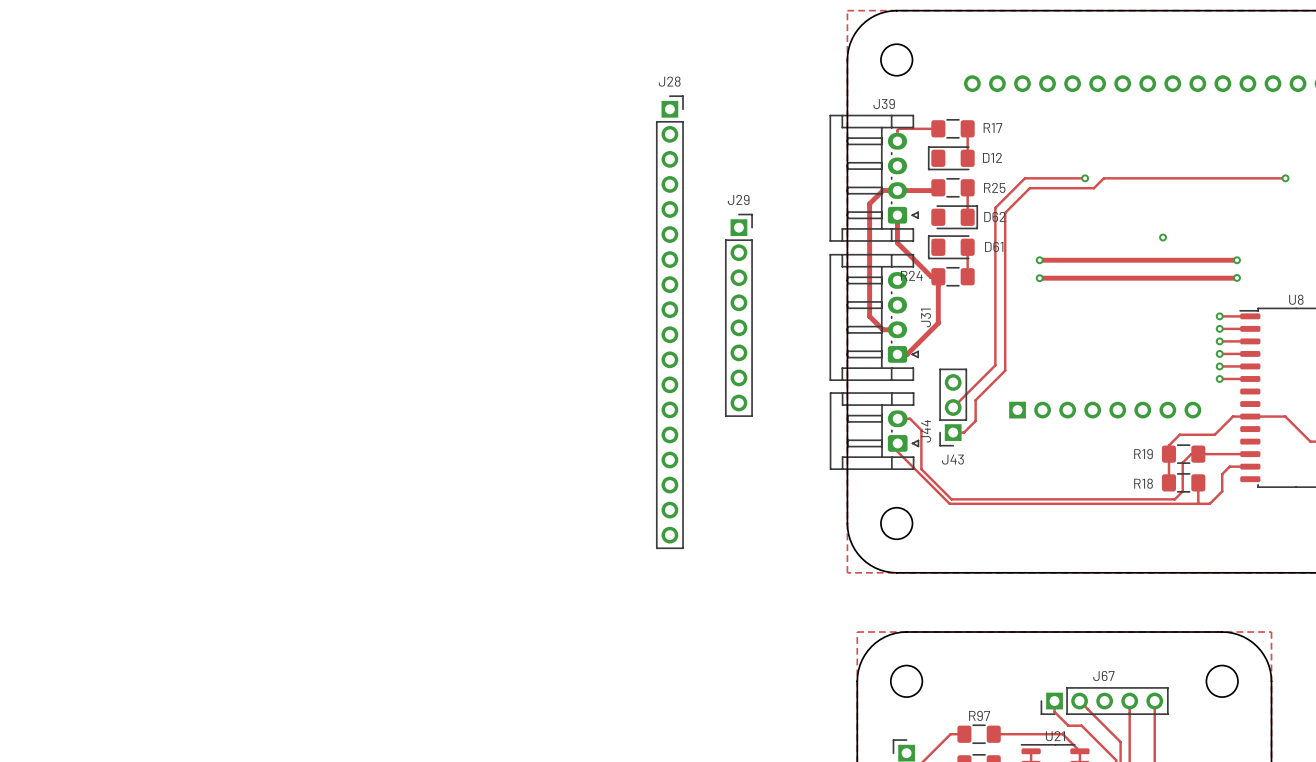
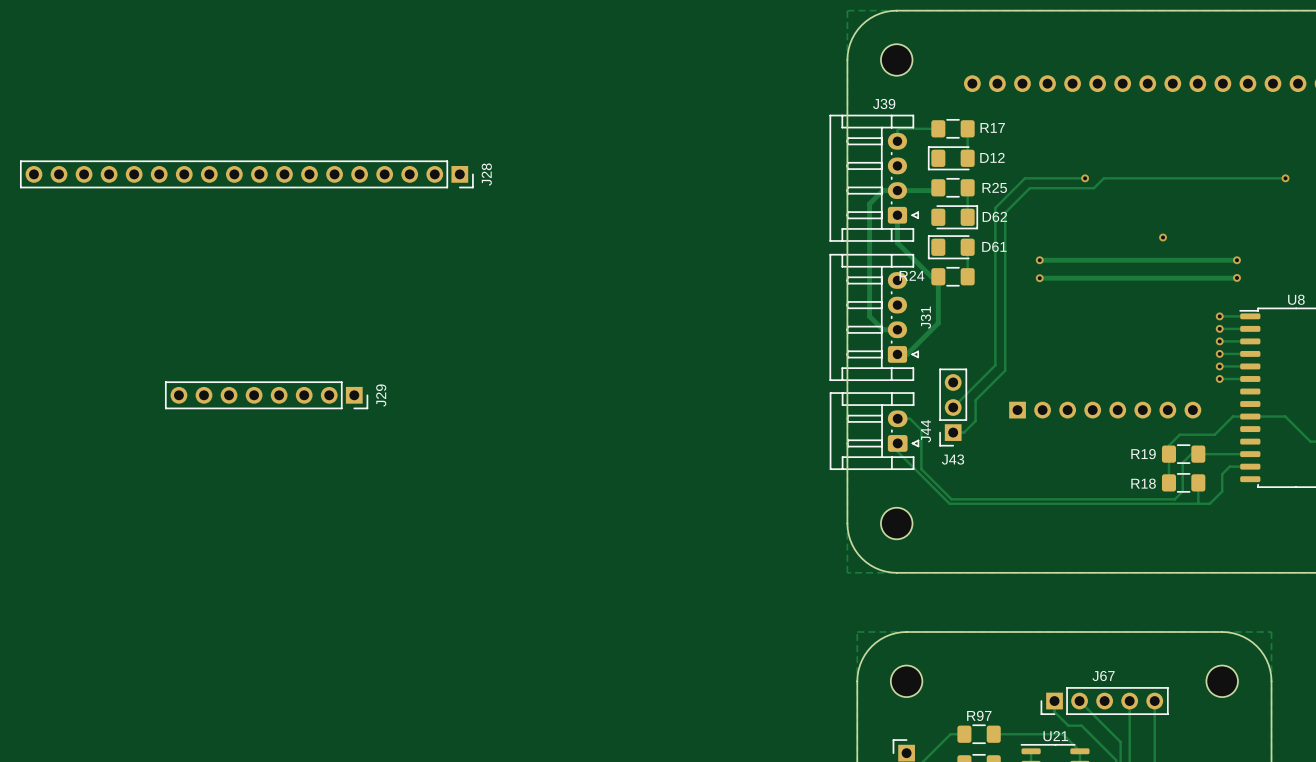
J29 rotation: 0° (738, 315) -> 90° clockwise (266, 395)
J29 position: (738, 315) -> (266, 395)
J28 rotation: 0° (669, 322) -> 90° clockwise (246, 174)
J28 position: (669, 322) -> (246, 174)

